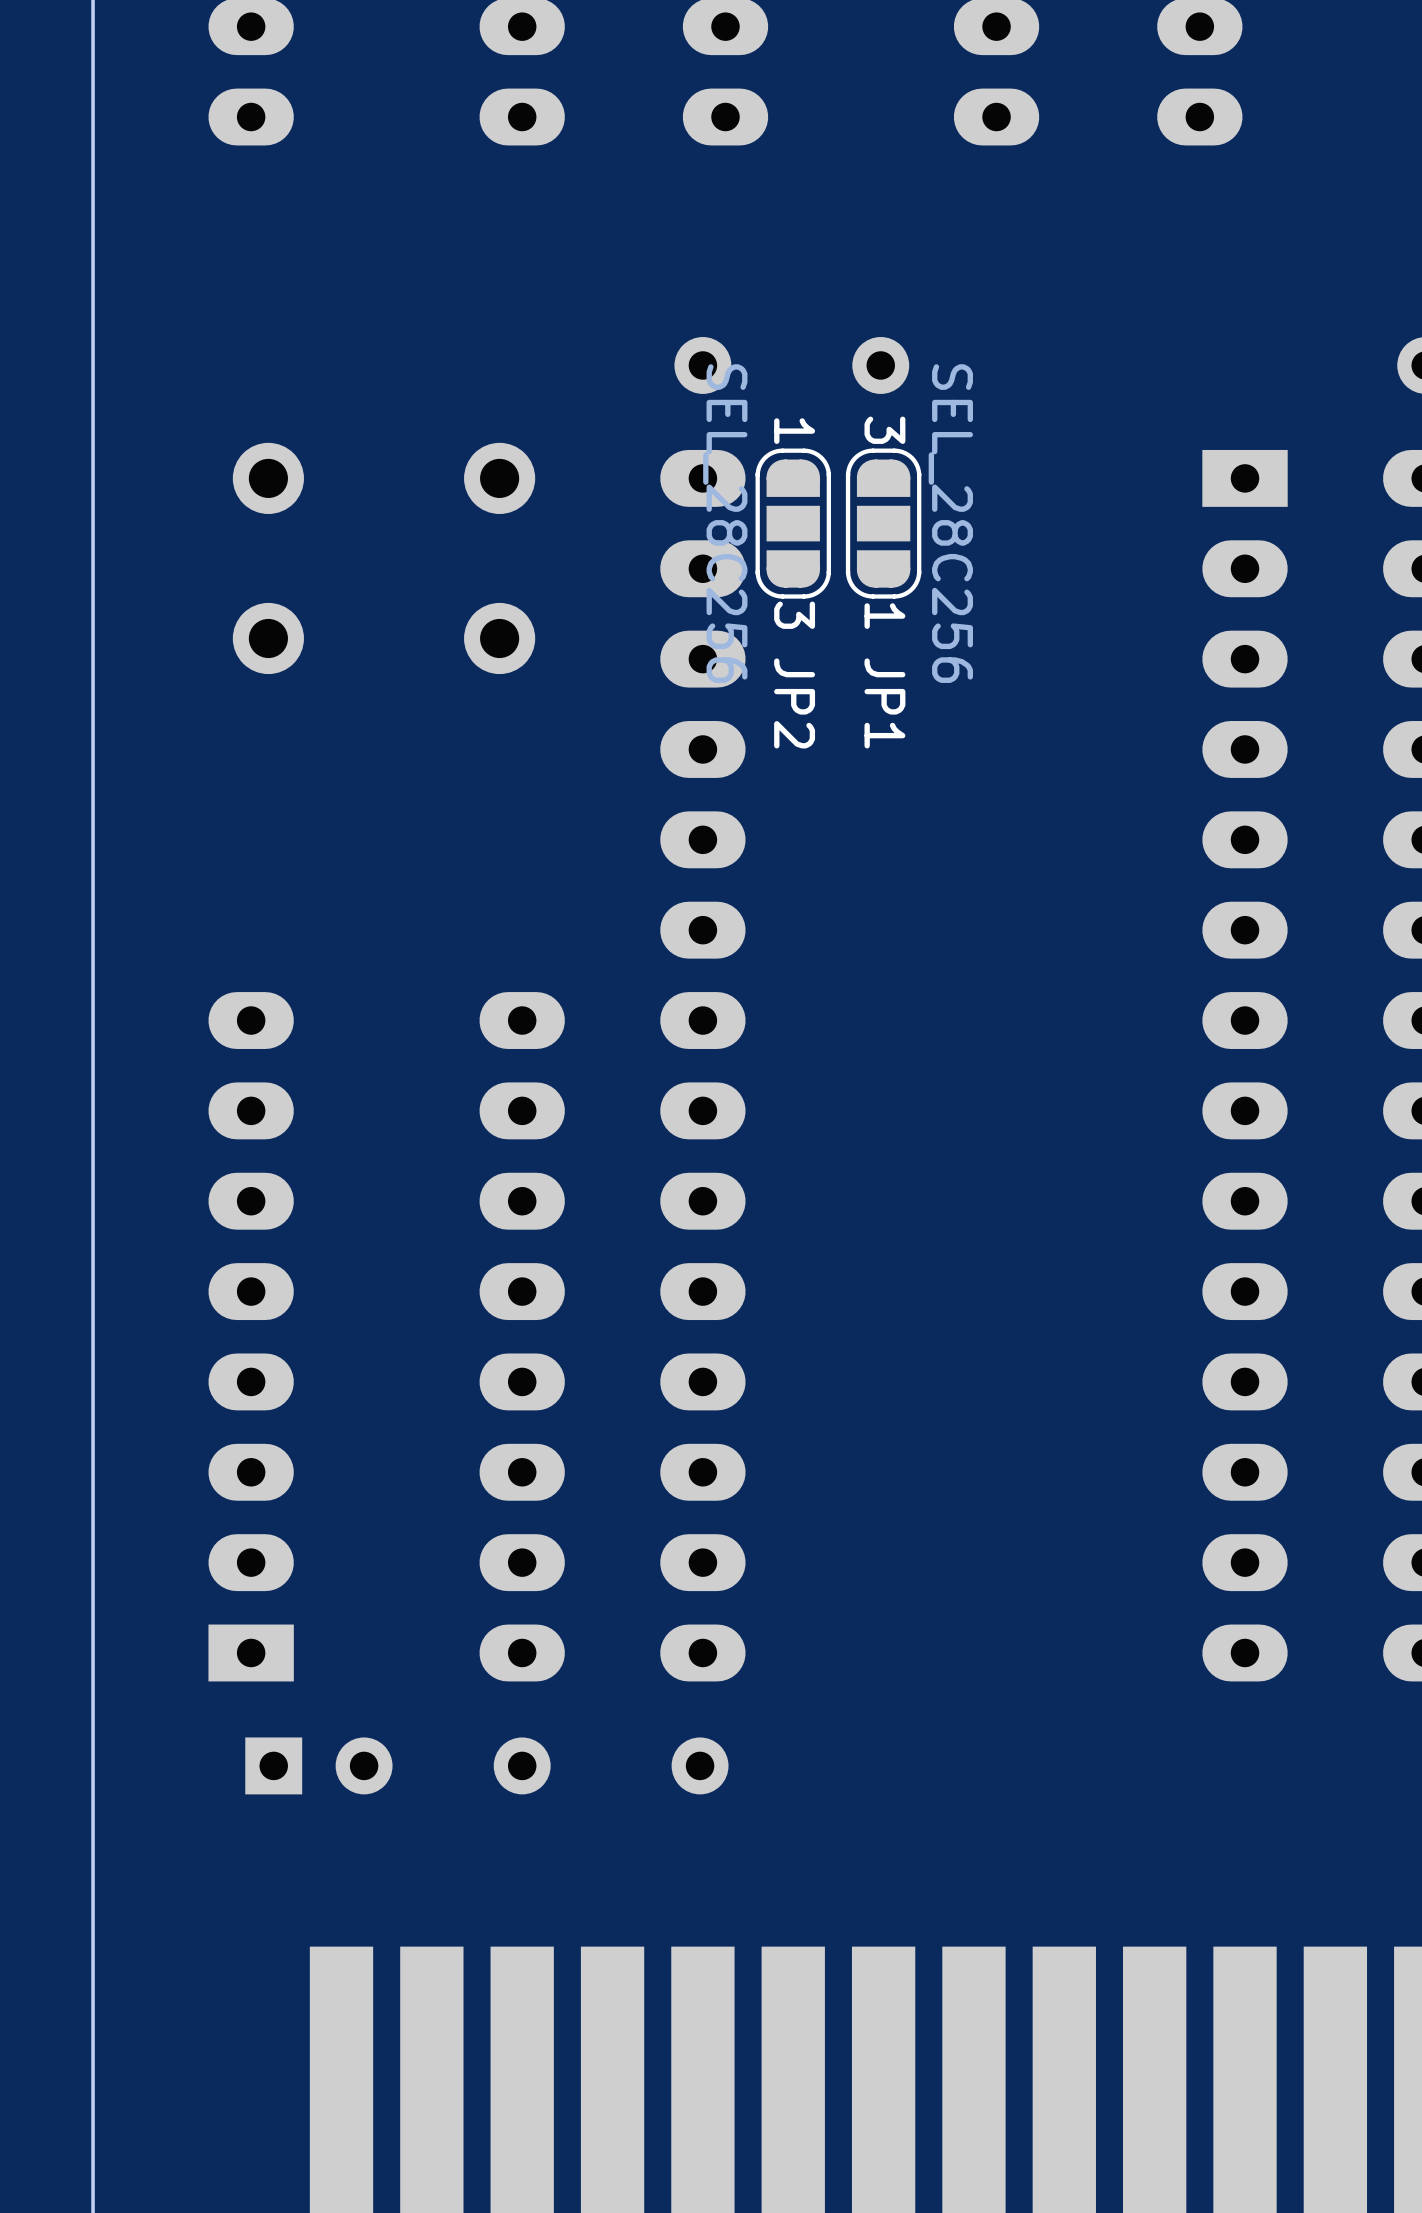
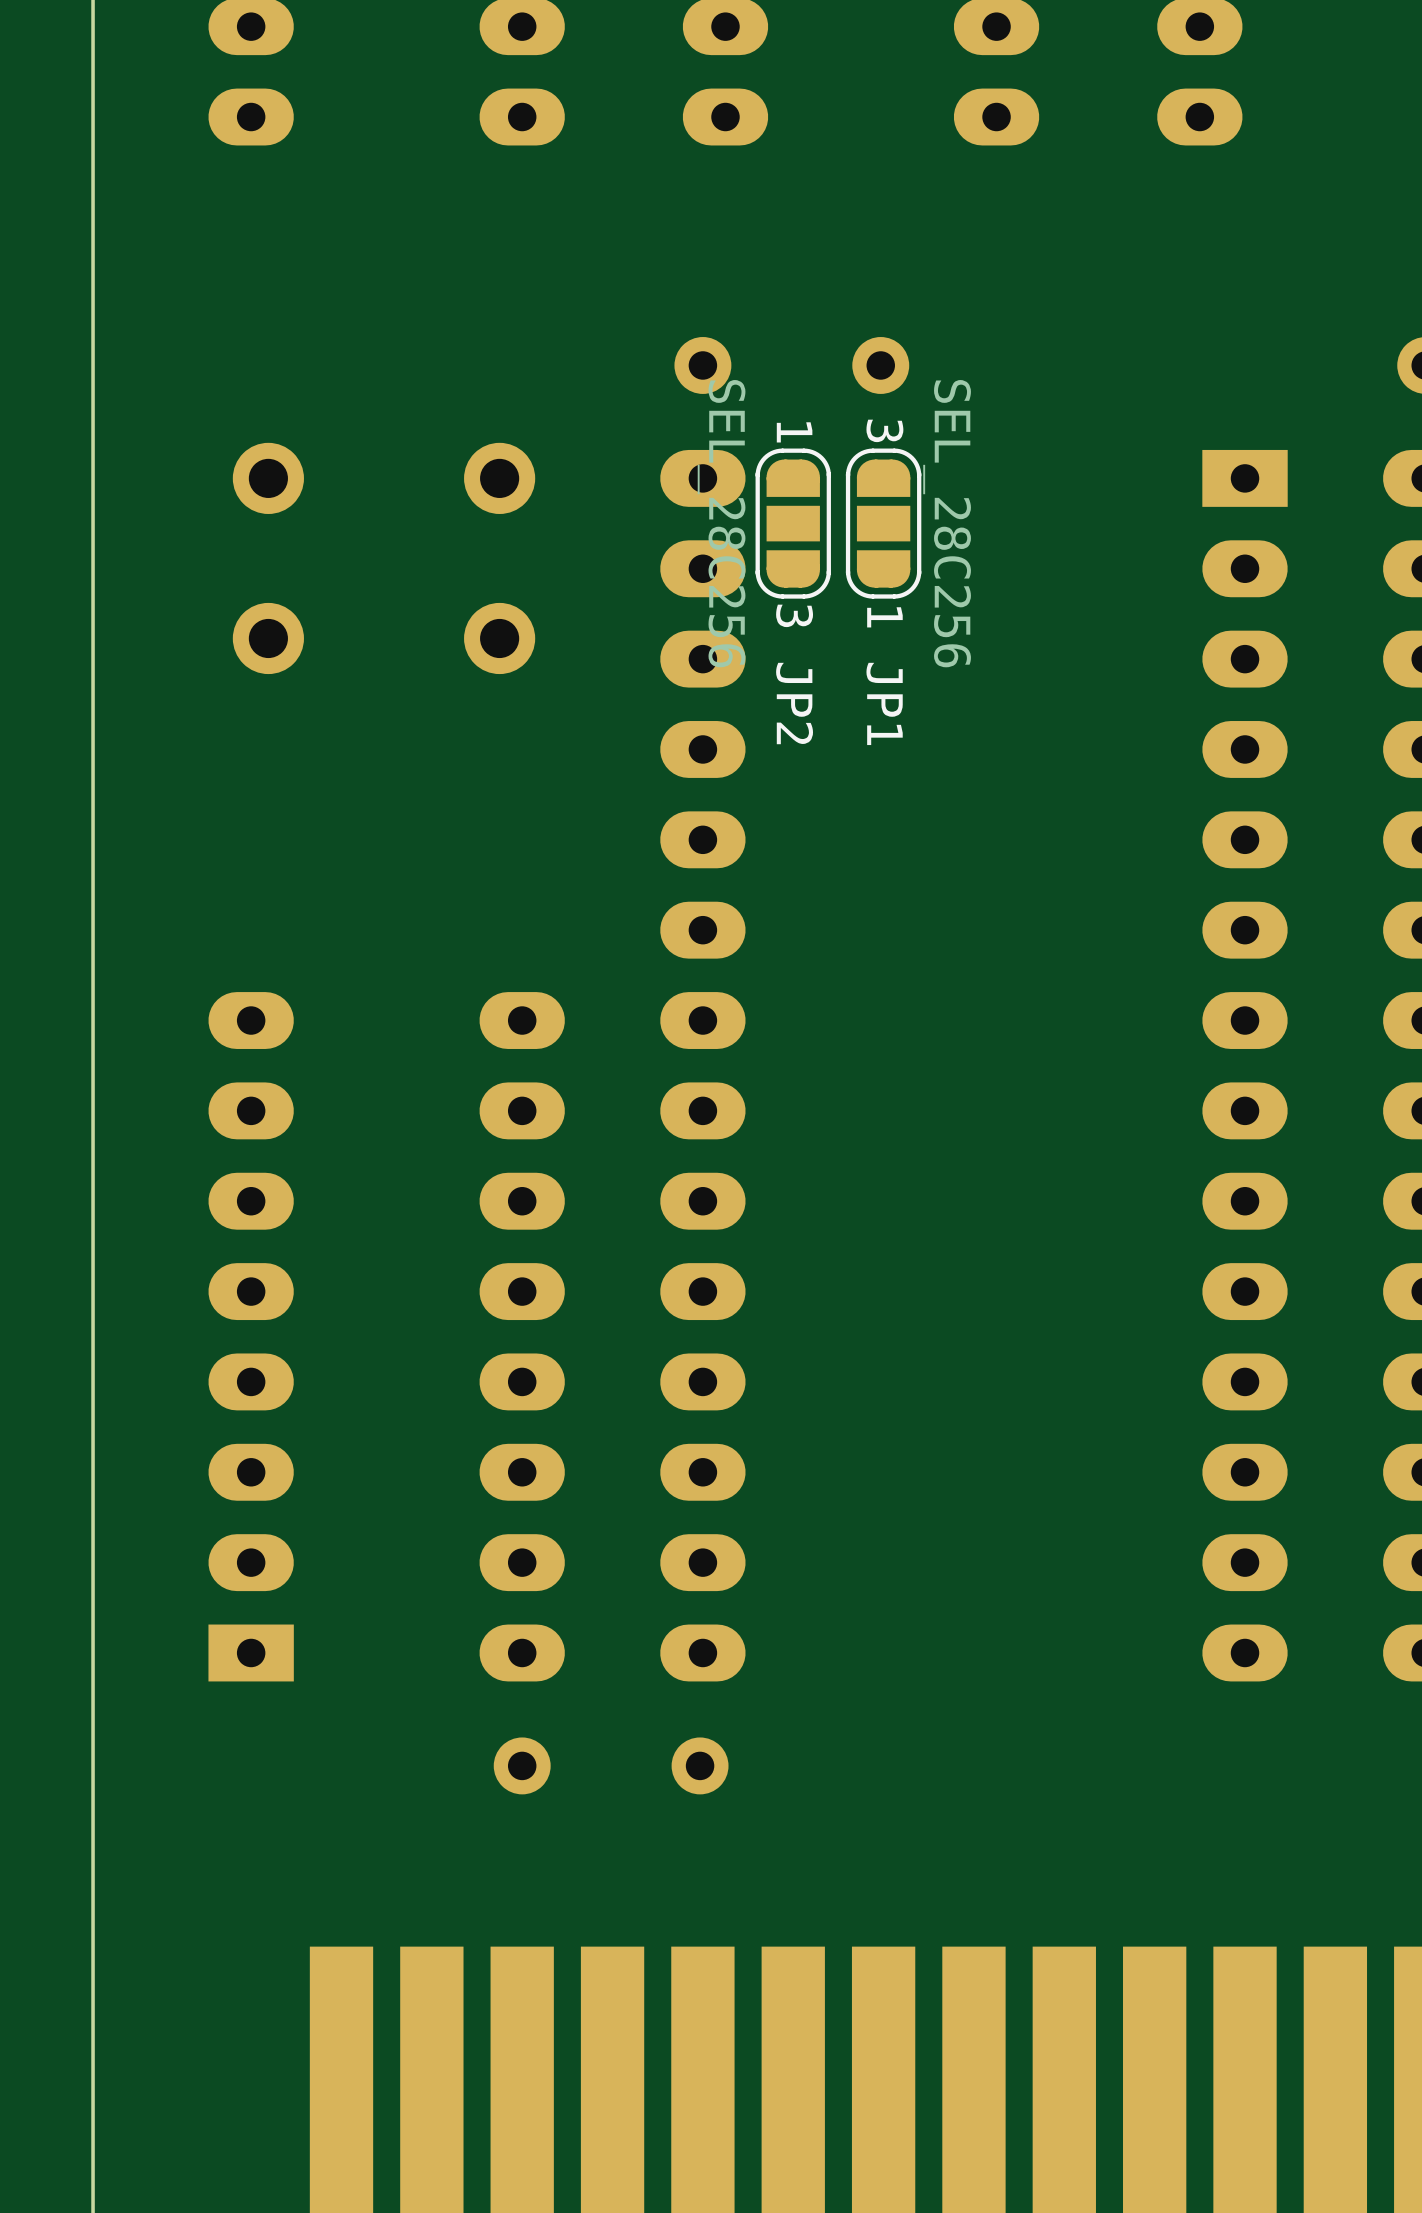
part: (318, 1765) -> none

